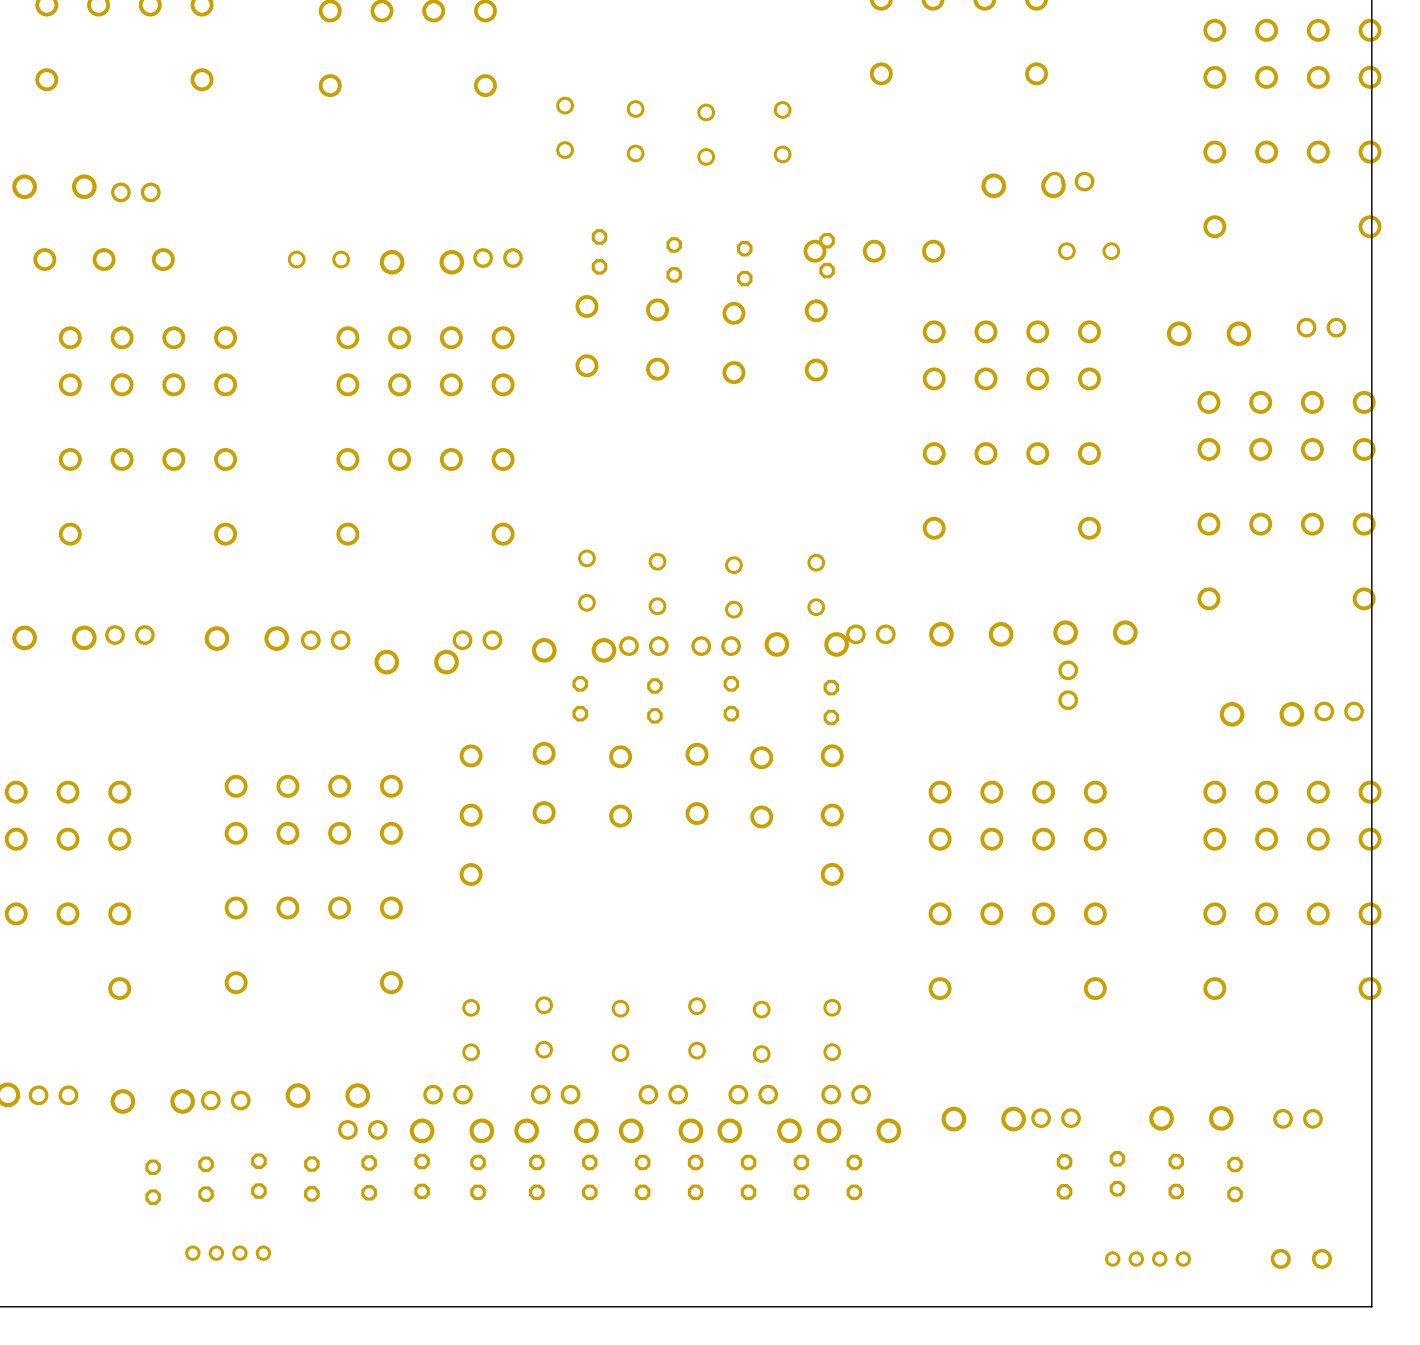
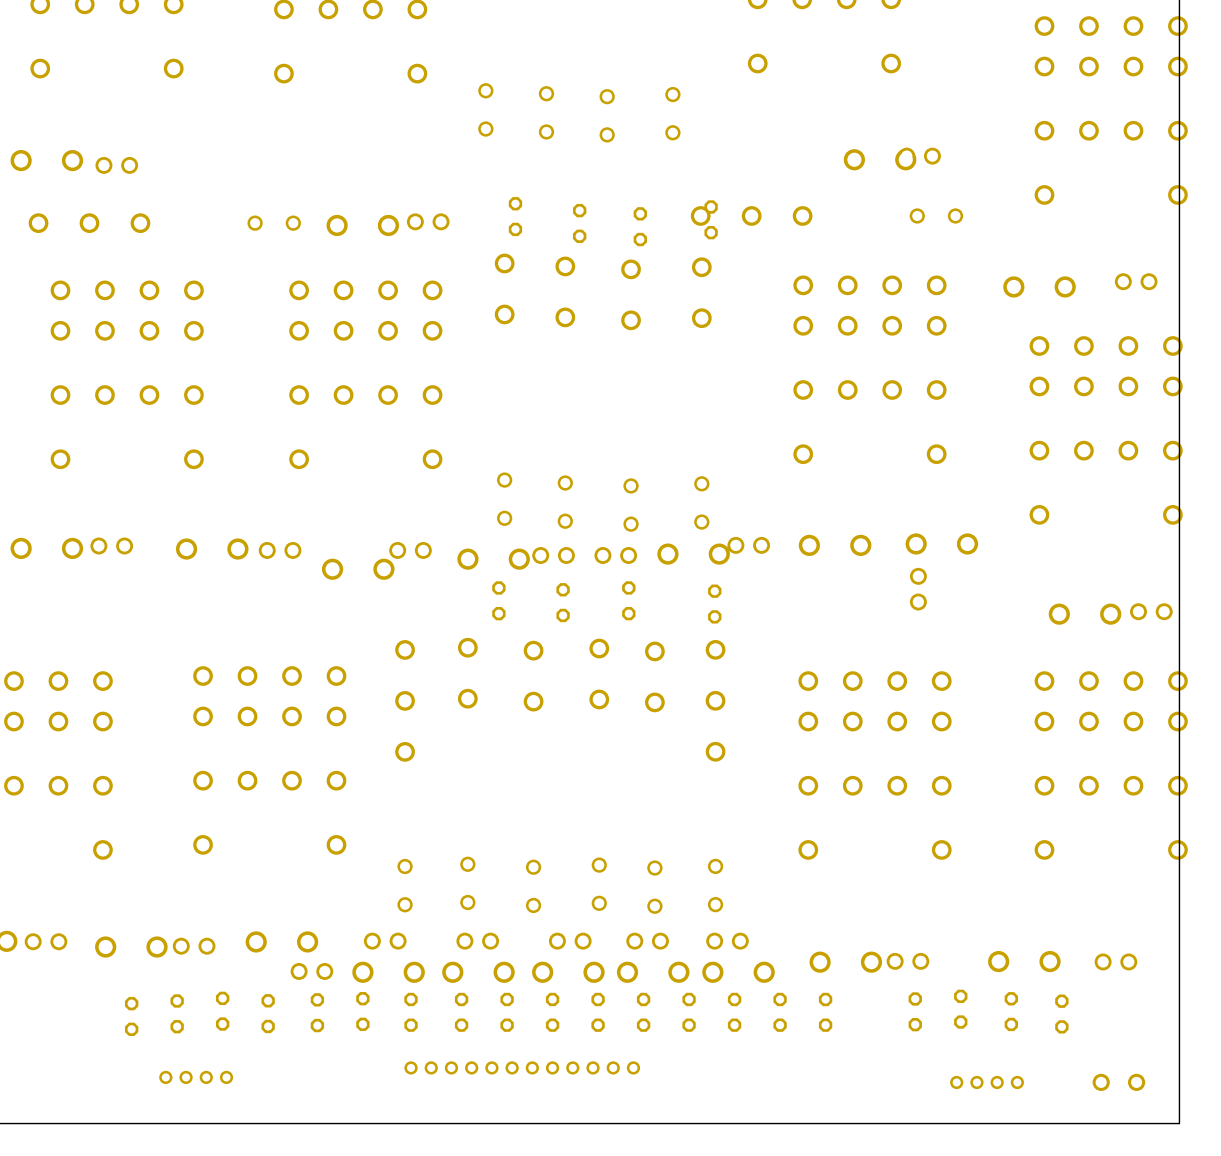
part: none -> (780, 1012)
part: none -> (825, 1012)
part: none -> (522, 1067)

